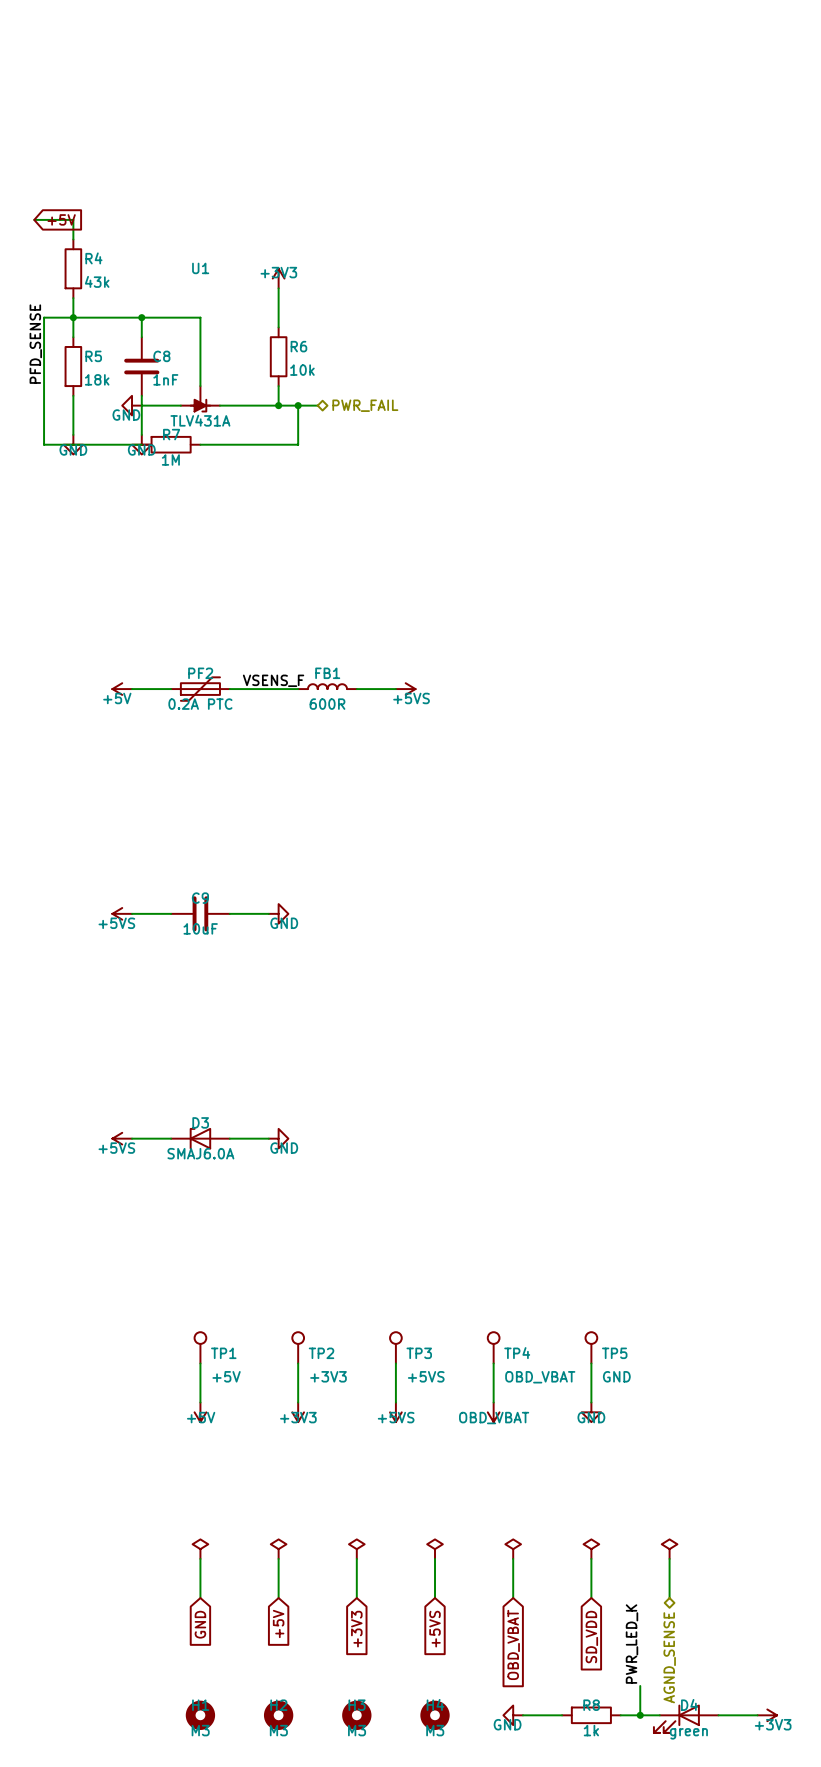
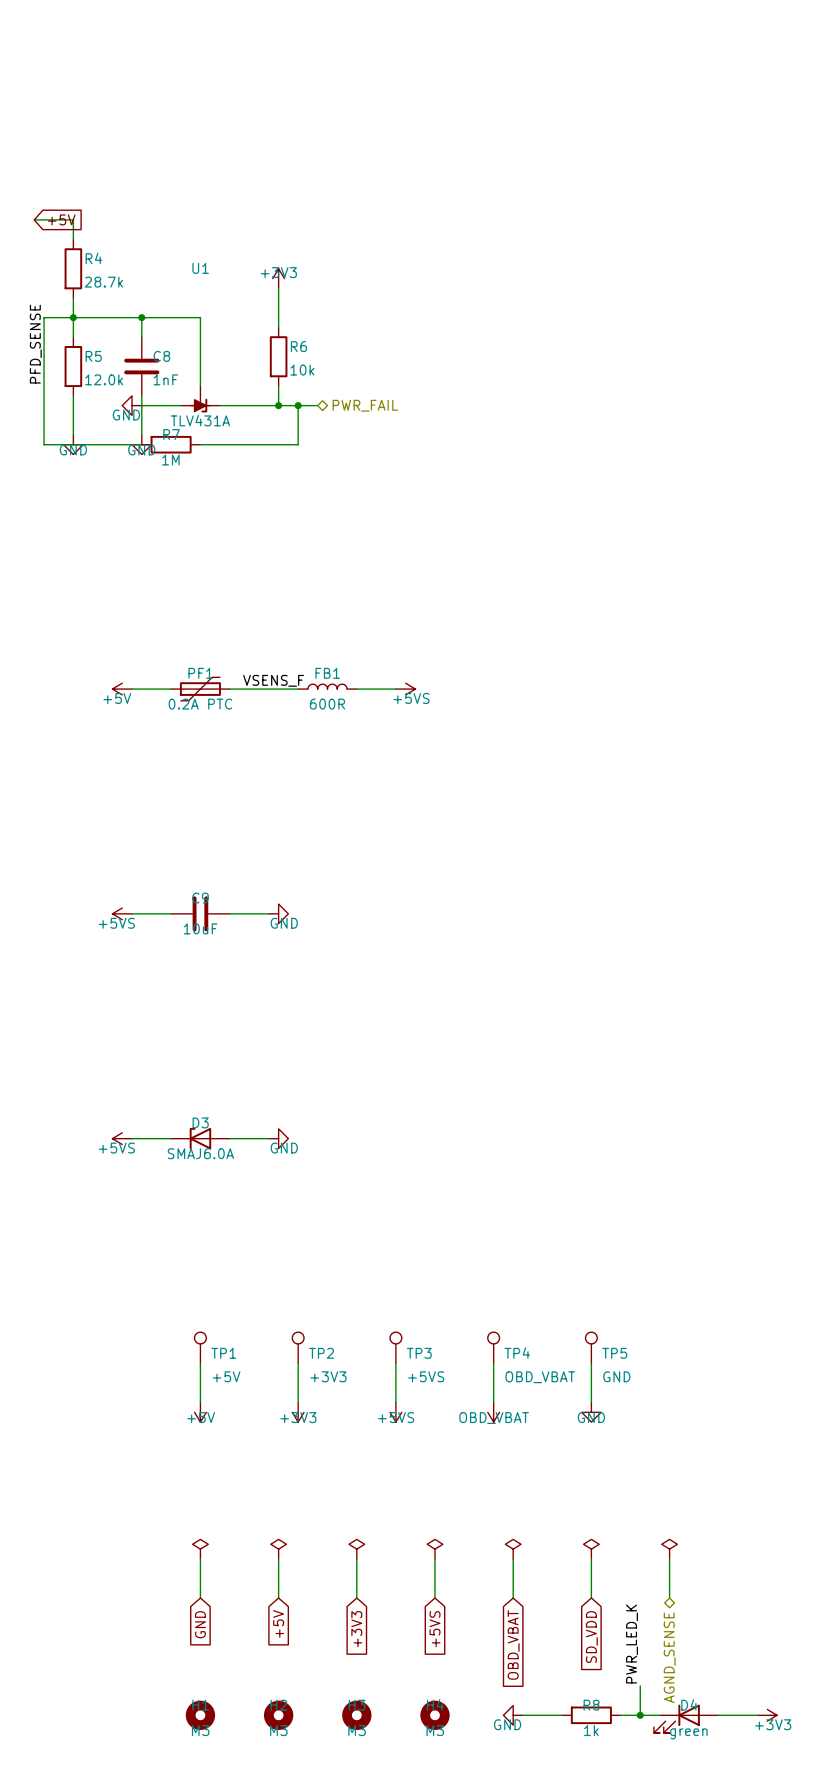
R4 value: 43k (97, 281) -> 28.7k (103, 282)
R5 value: 18k (97, 379) -> 12.0k (104, 379)
PF2 name: PF2 (200, 673) -> PF1 (200, 673)

